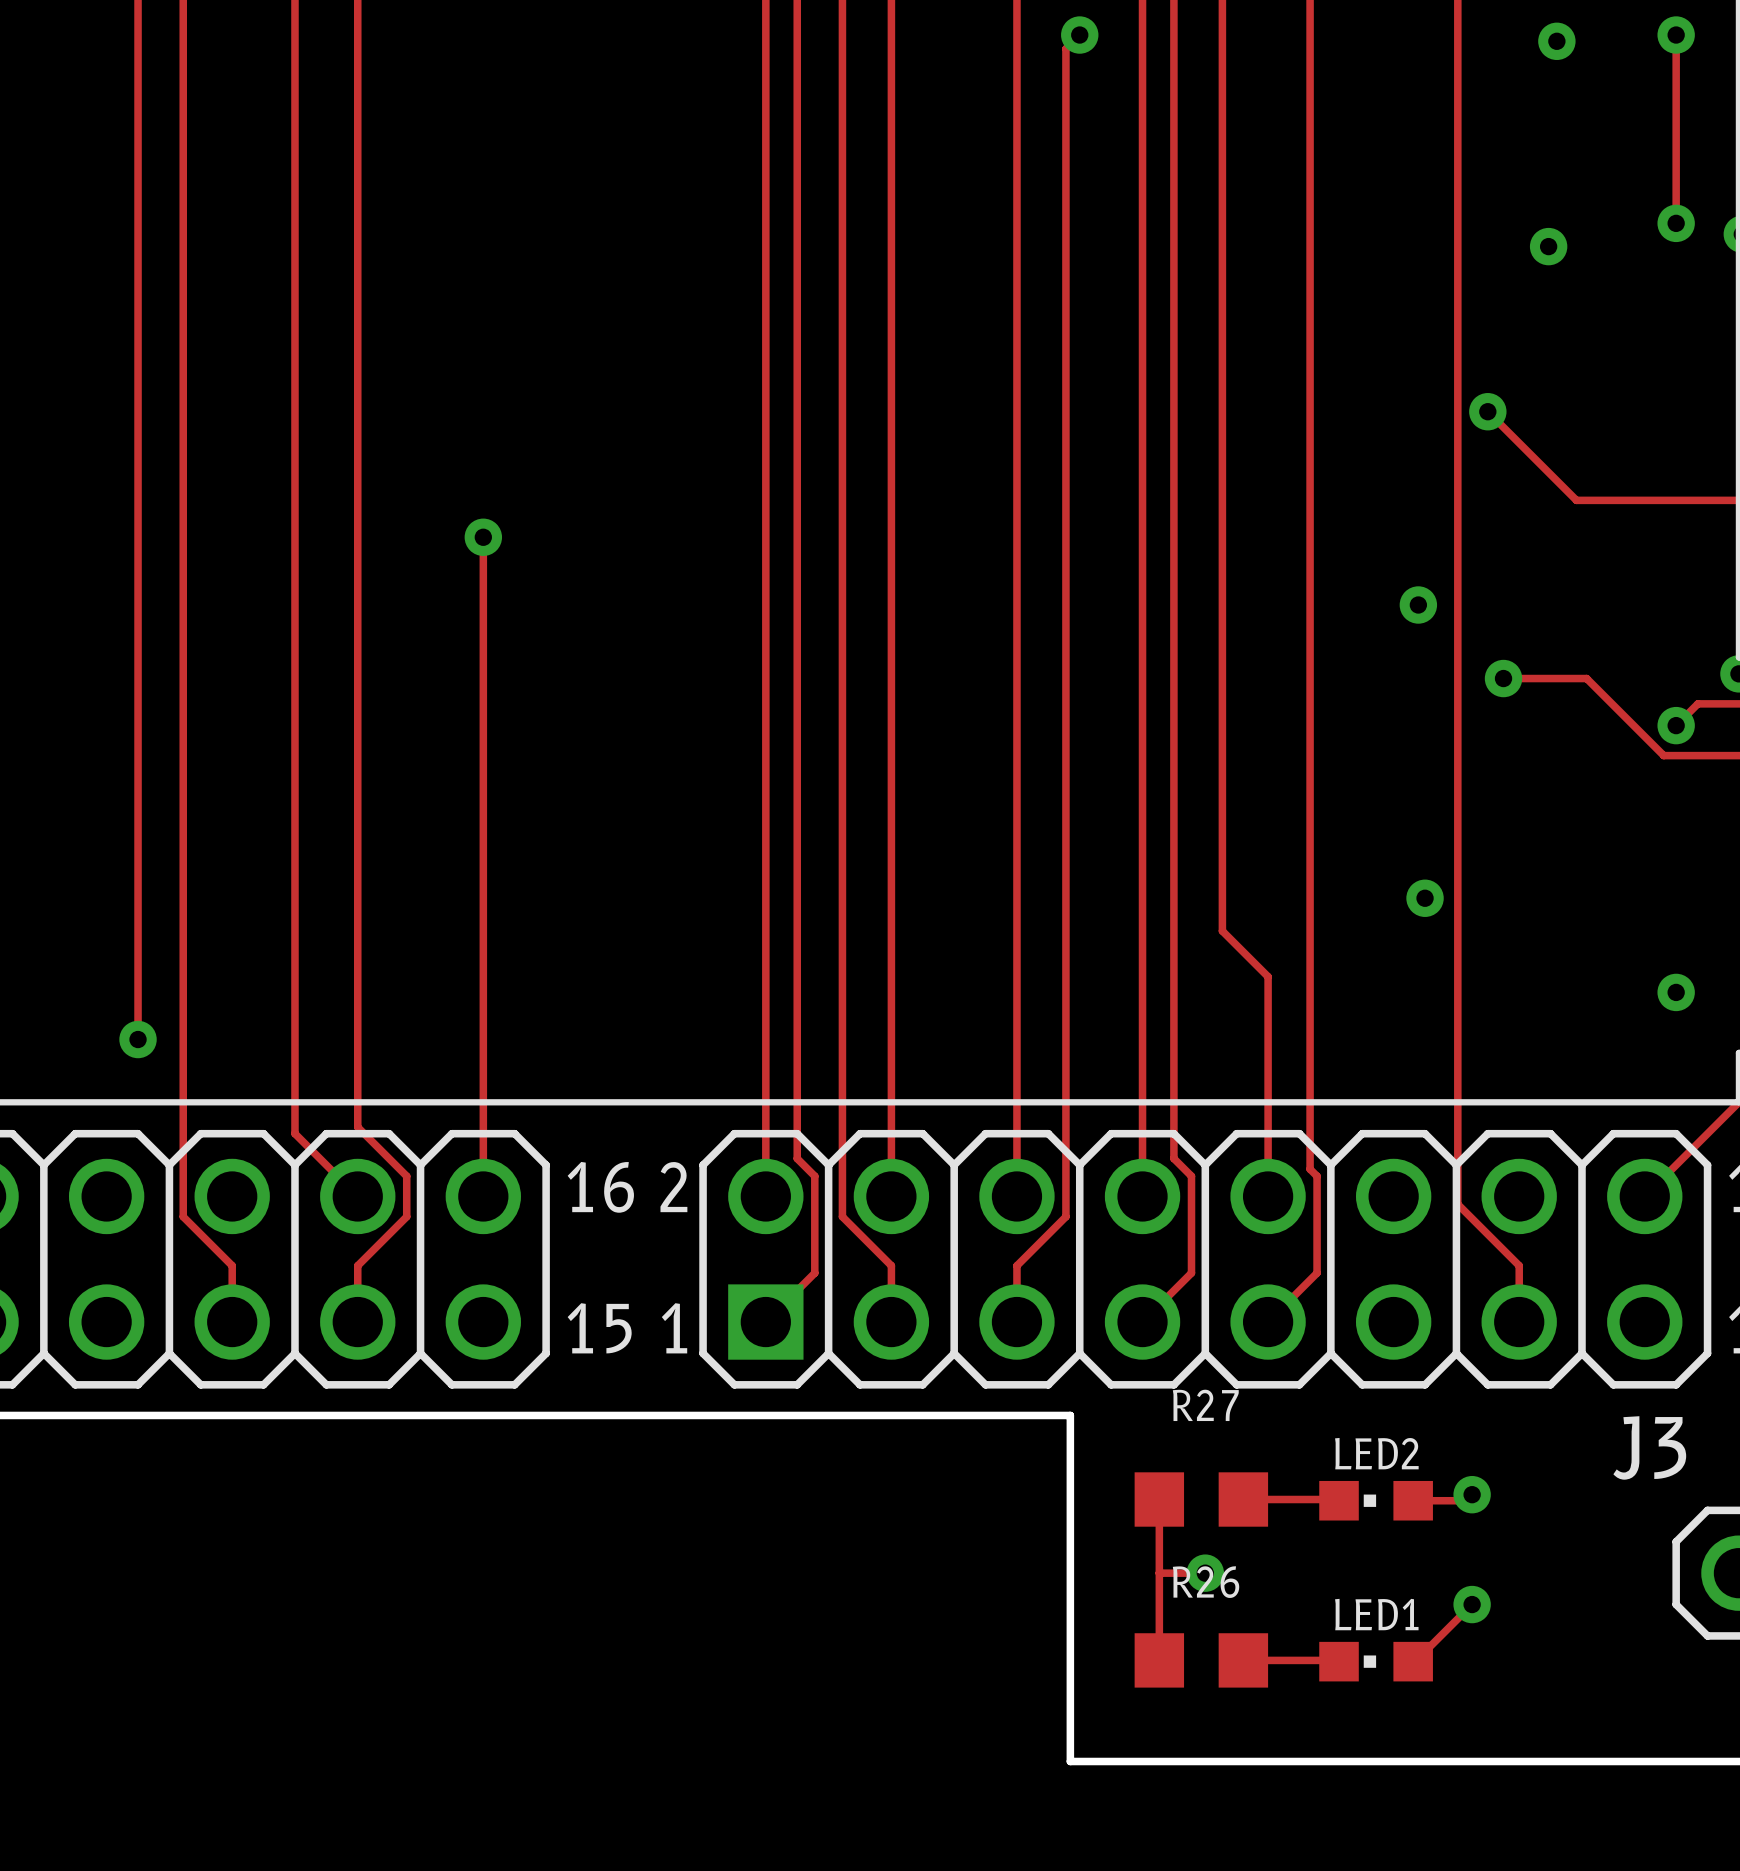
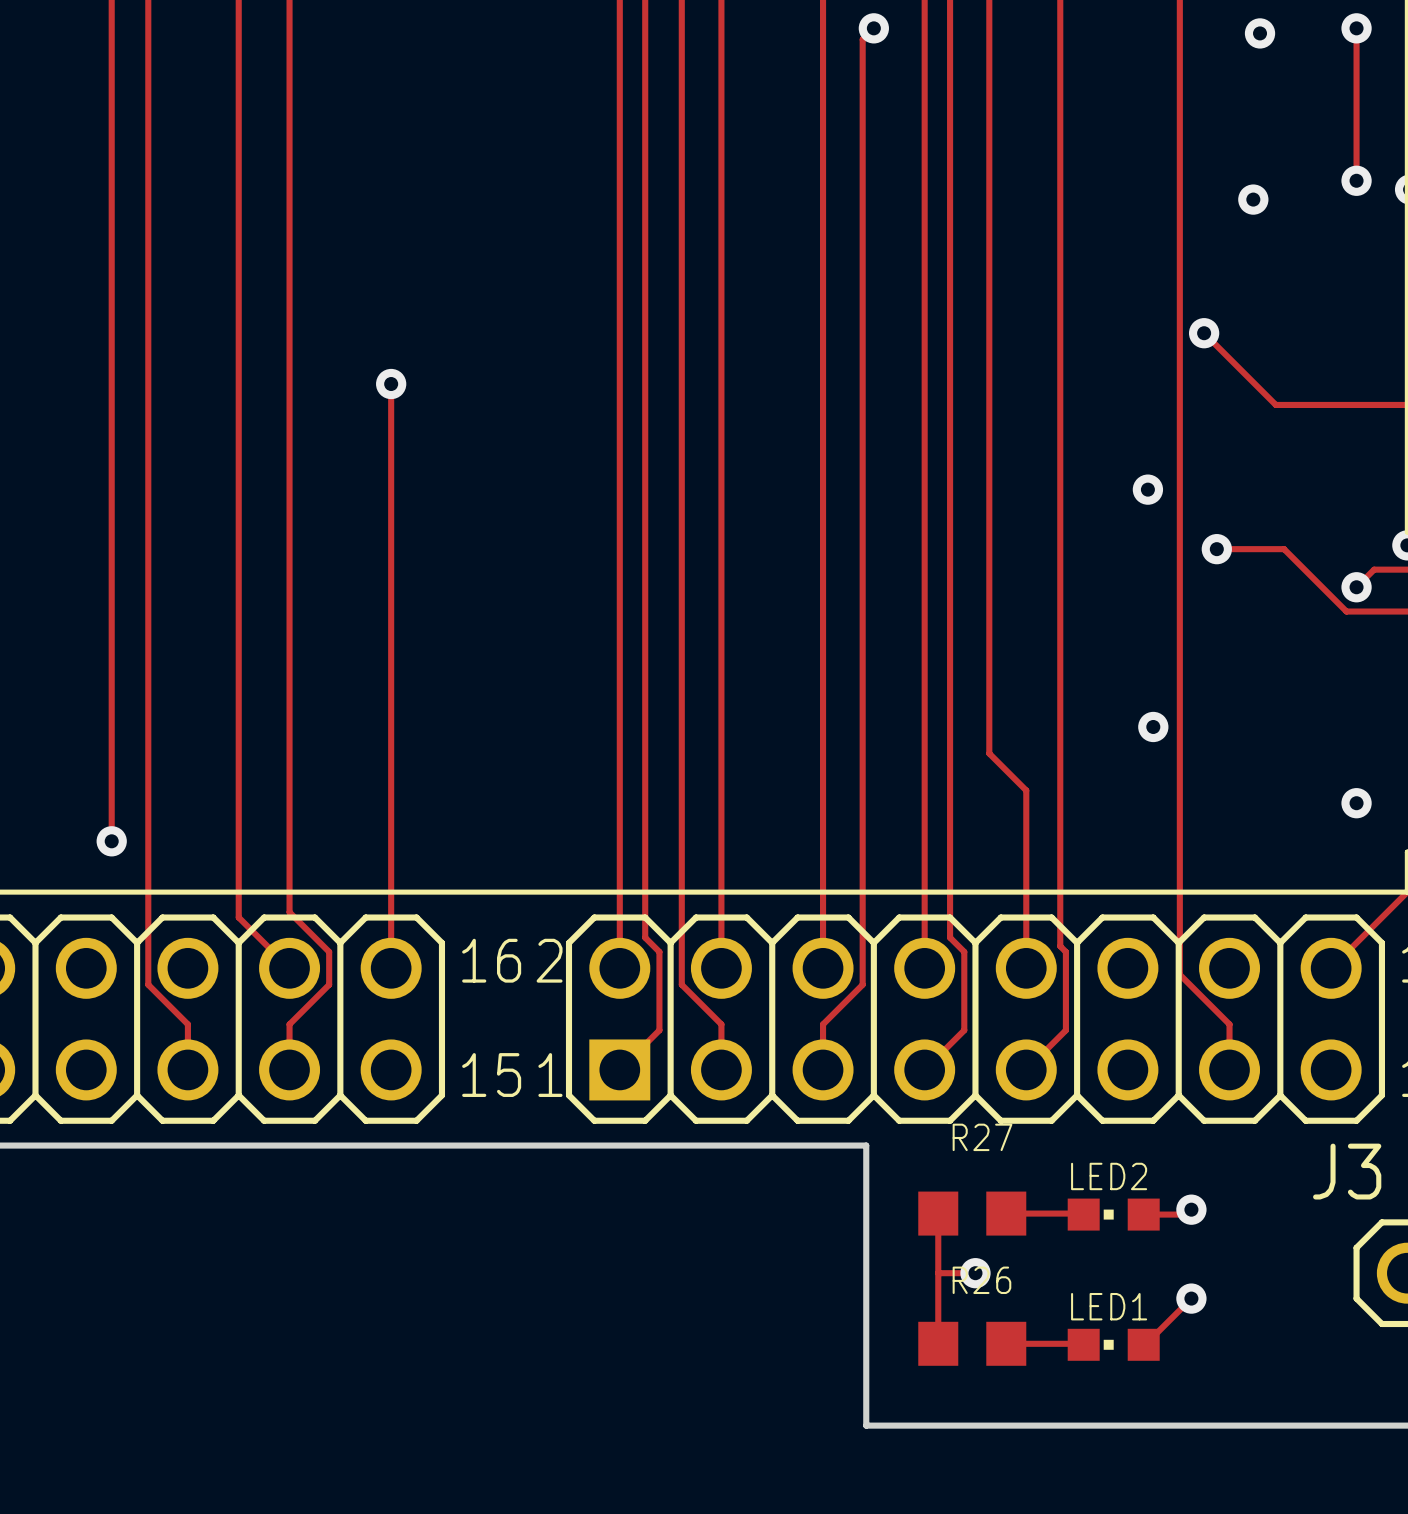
track: none -> (391, 384) (391, 434)
via position: (483, 537) -> (391, 384)

